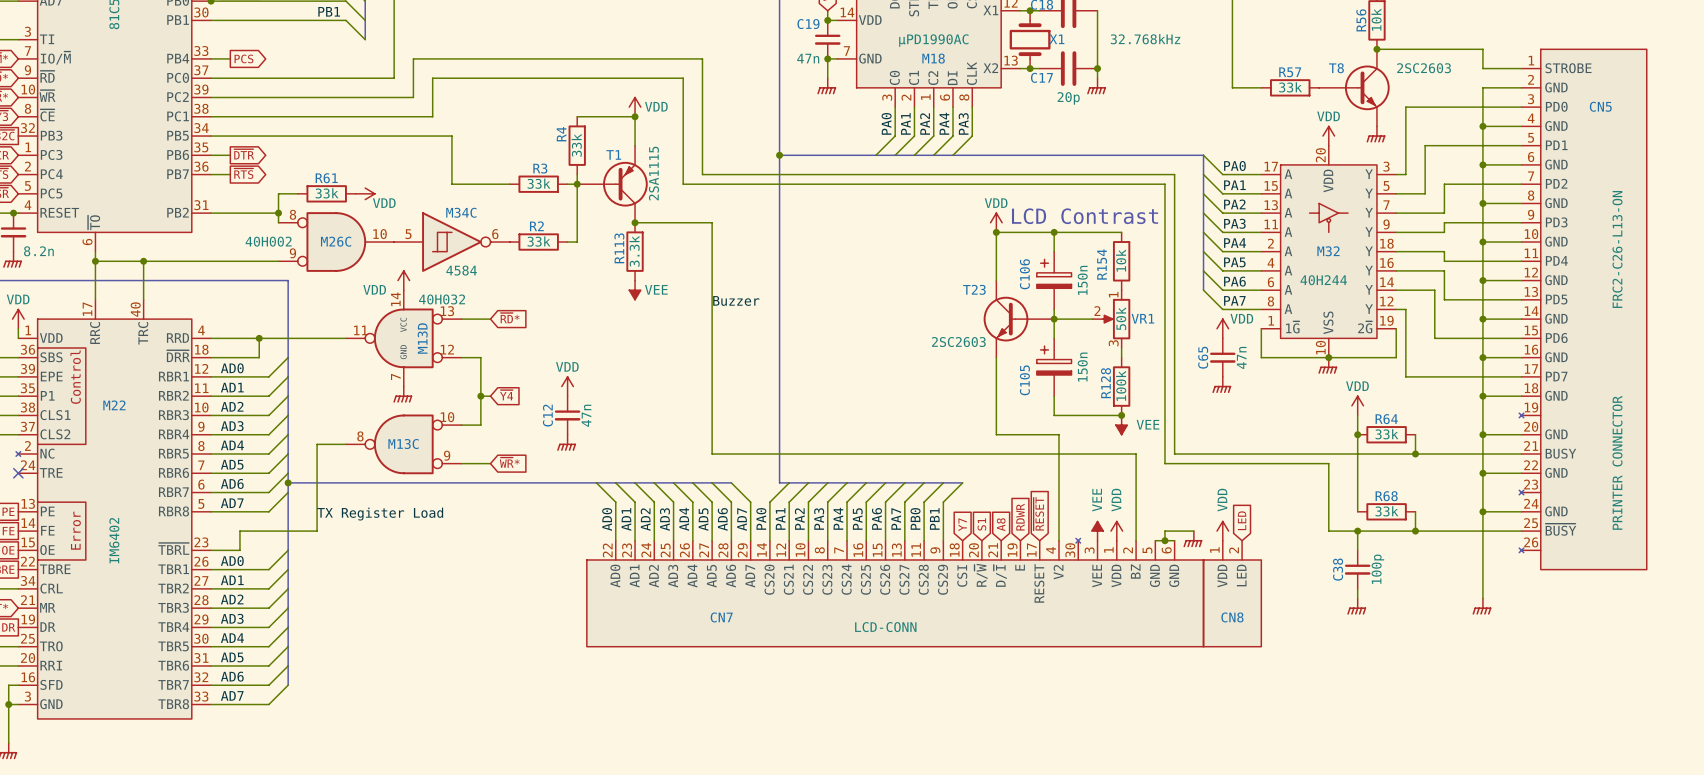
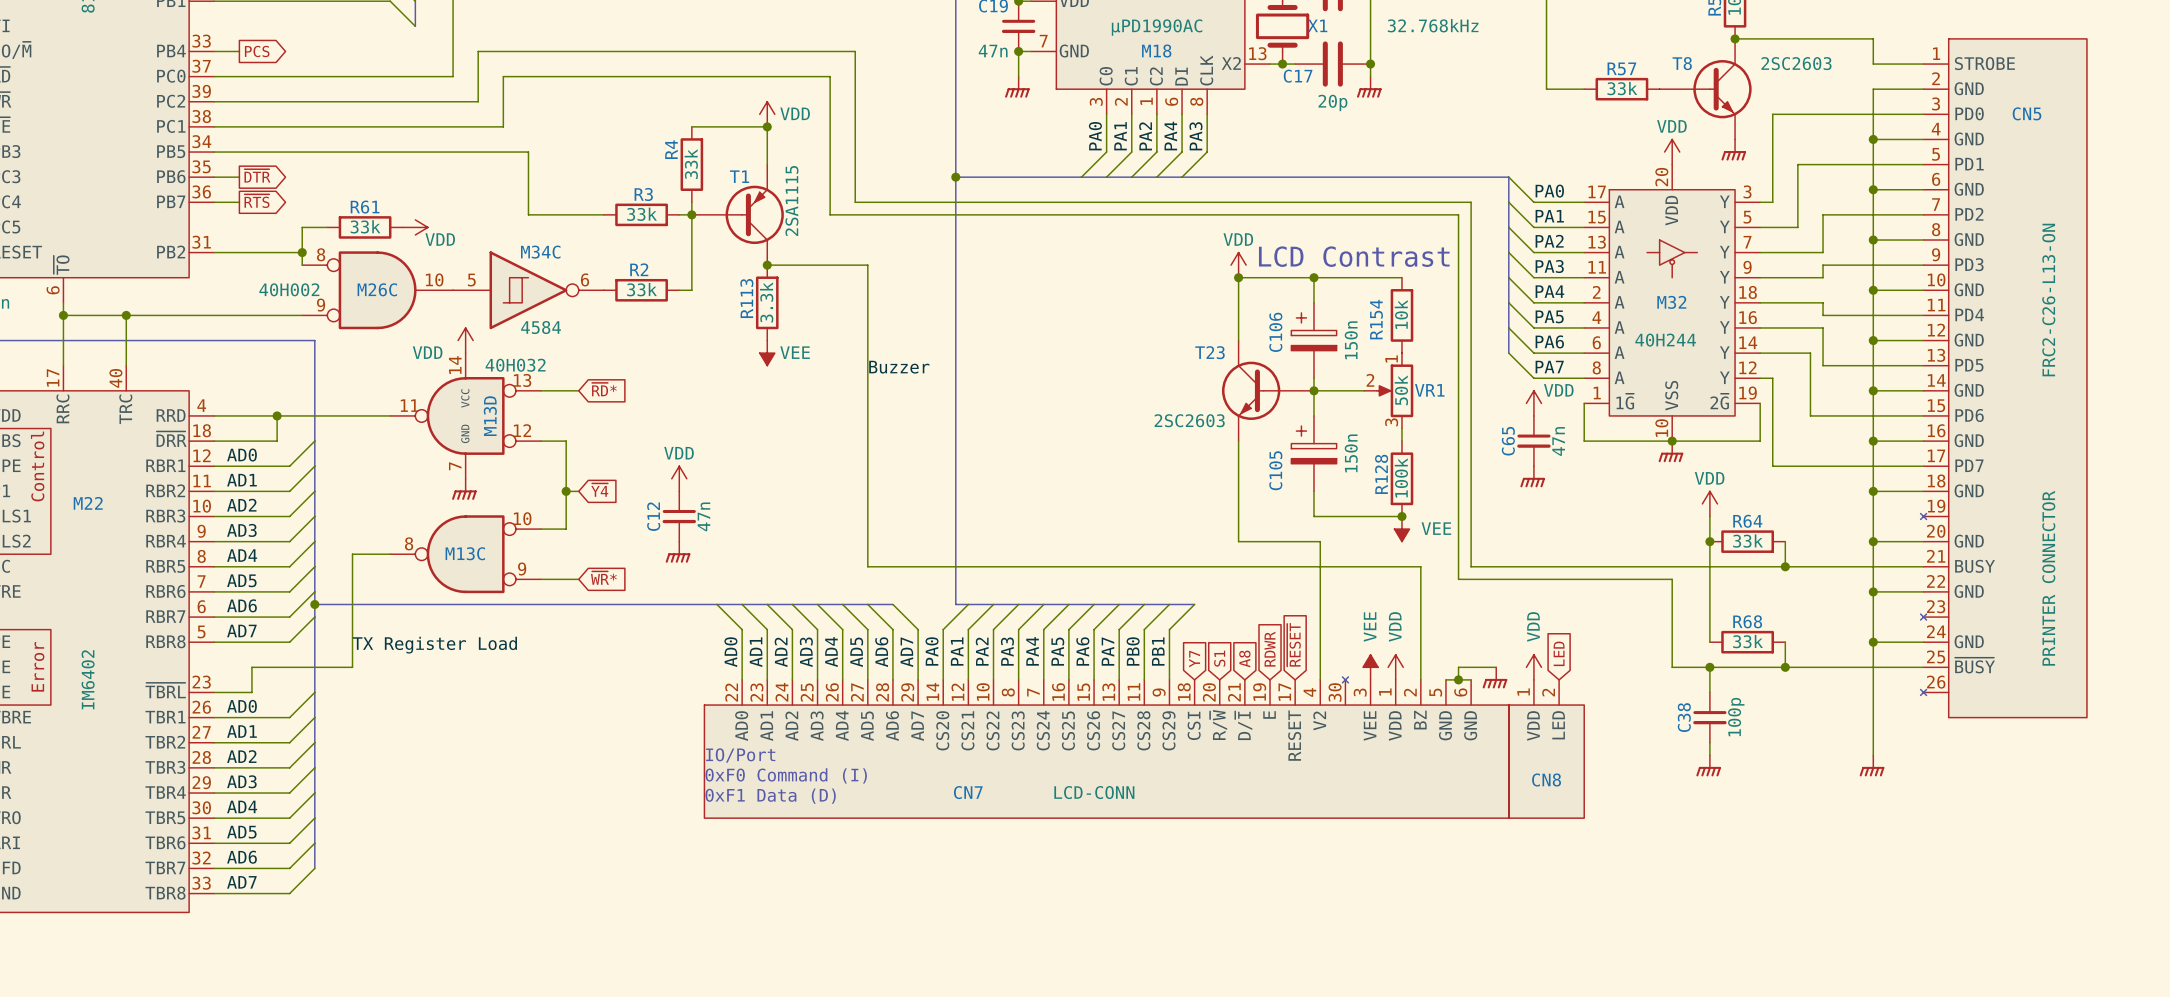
text: none -> IO/Port (740, 755)
text: none -> 0xF0 Command (I) (786, 775)
CN7 name position: CN7 (721, 617) -> CN7 (968, 792)
text: none -> 0xF1 Data (D) (770, 796)

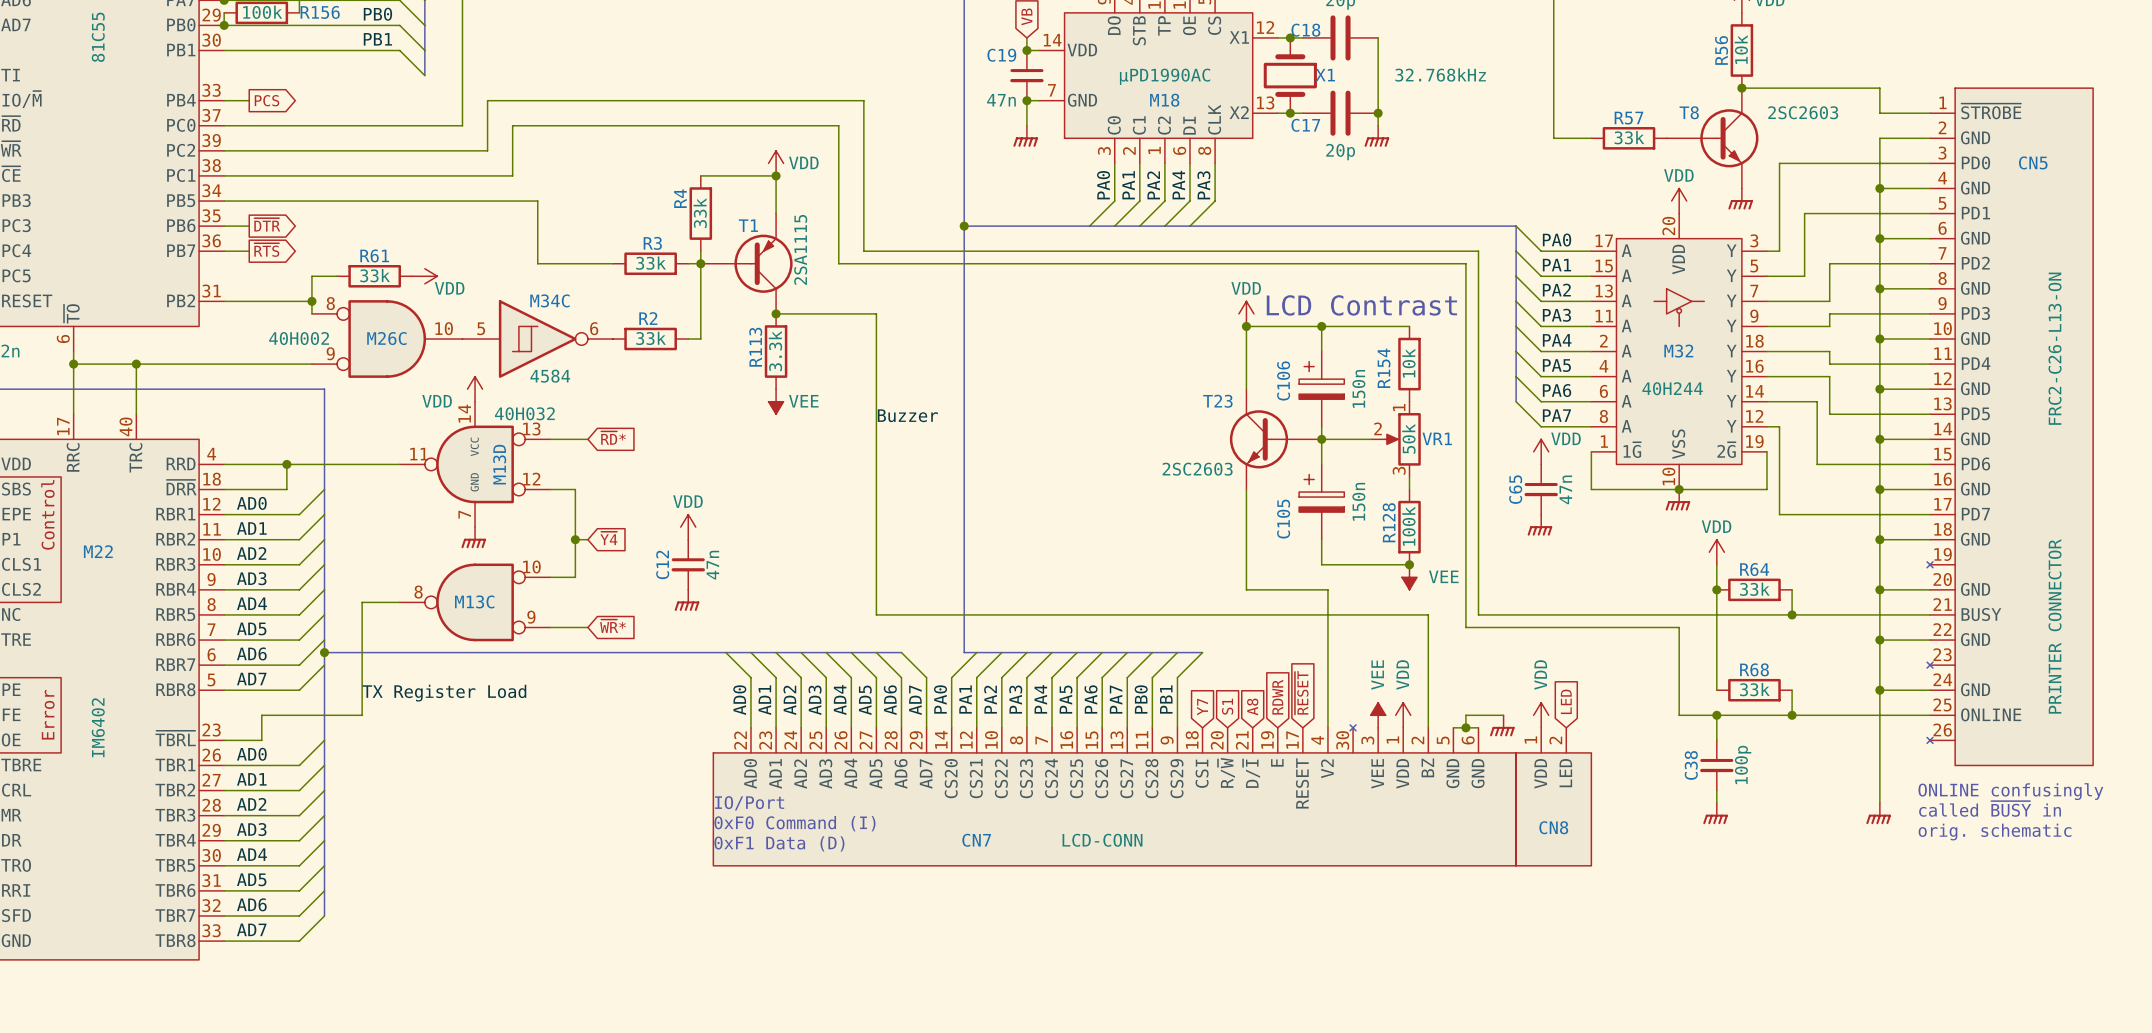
CN5 pin name: STROBE (1984, 63) -> ~{STROBE} (1991, 111)
CN5 pin name: ~{BUSY} (1974, 665) -> ONLINE (1991, 714)
text: none -> ONLINE confusingly (2010, 791)
text: none -> called ~{BUSY} in (1990, 808)
text: none -> orig. schematic (1995, 832)

